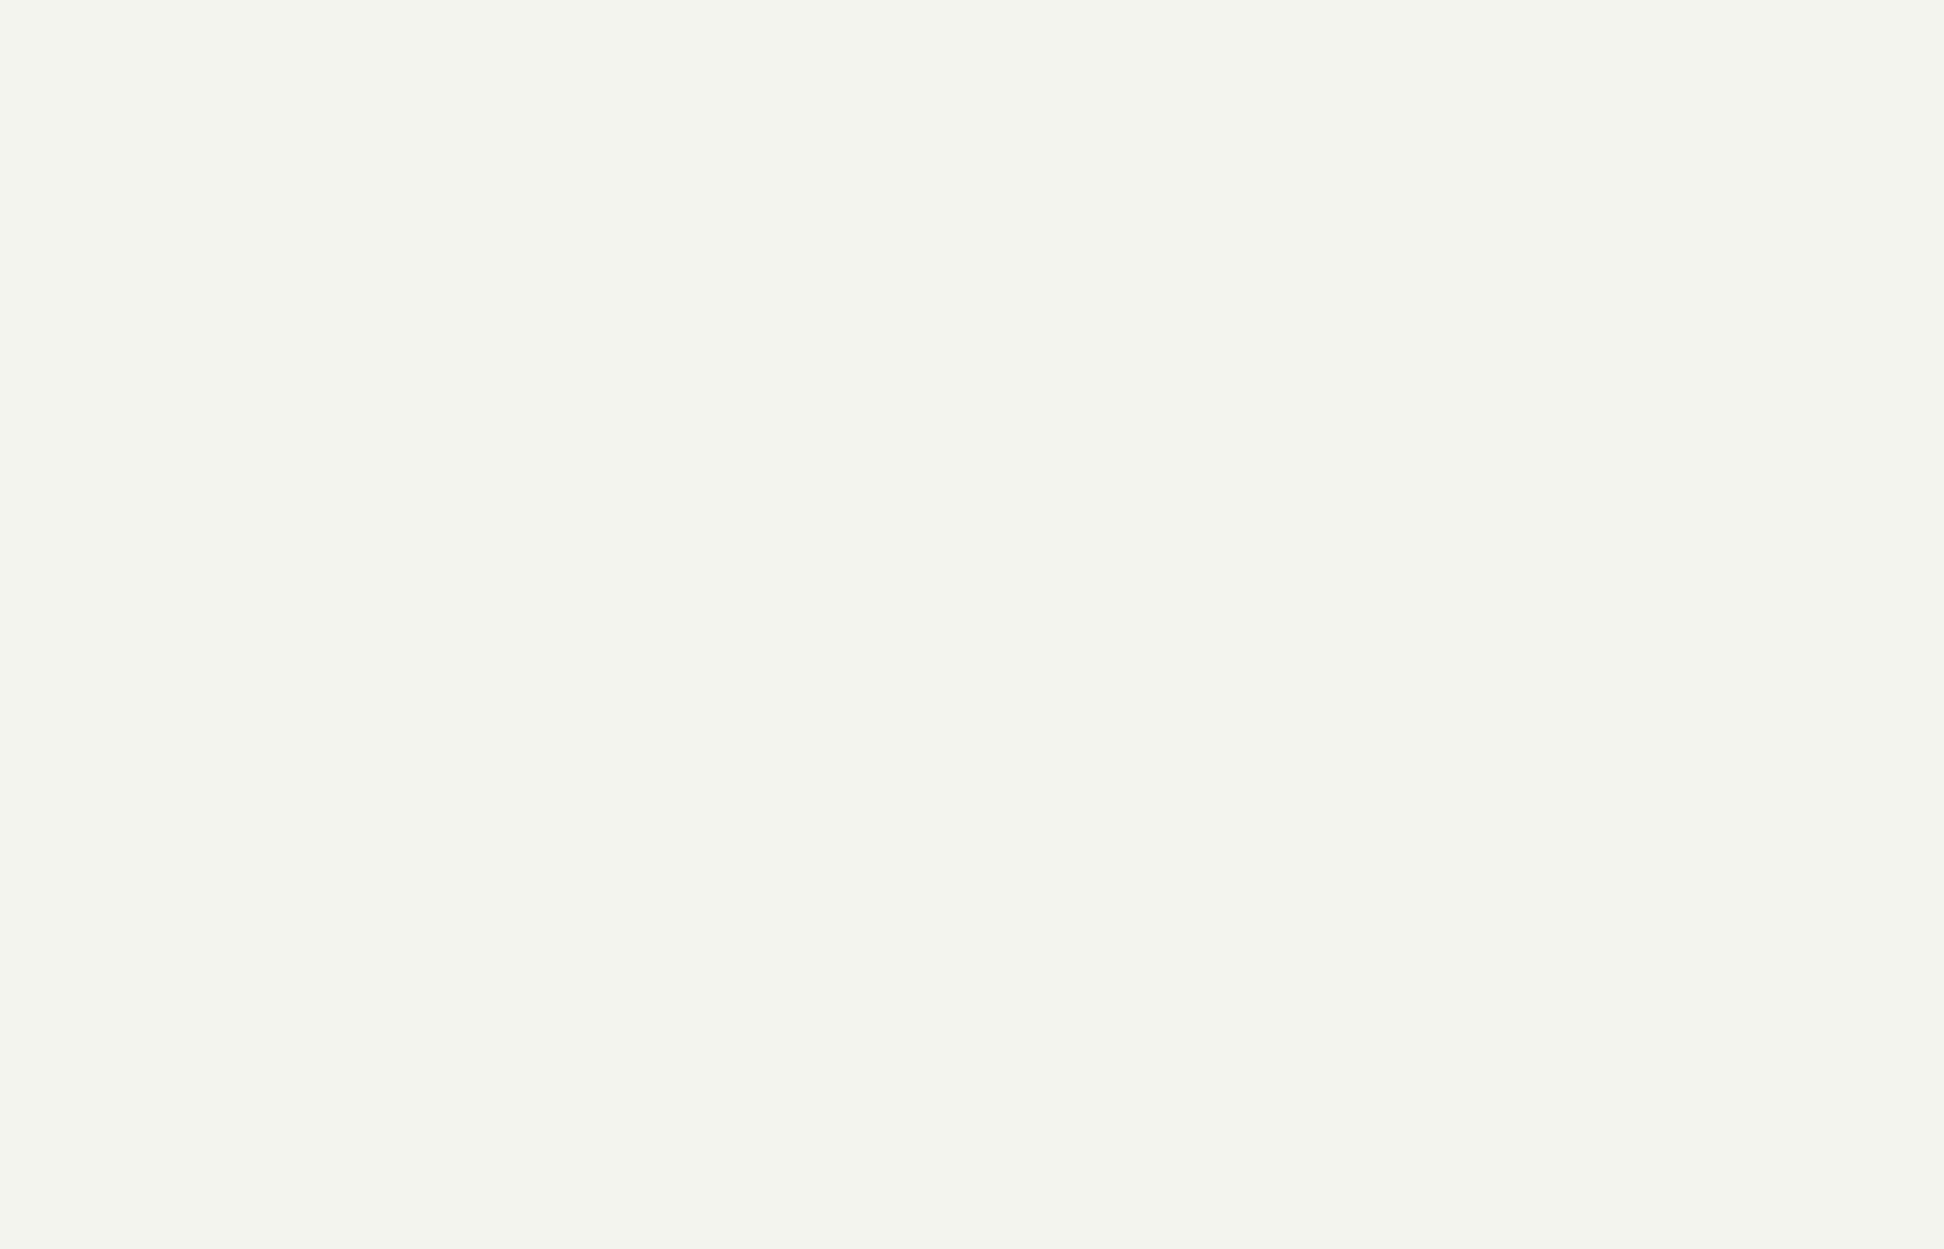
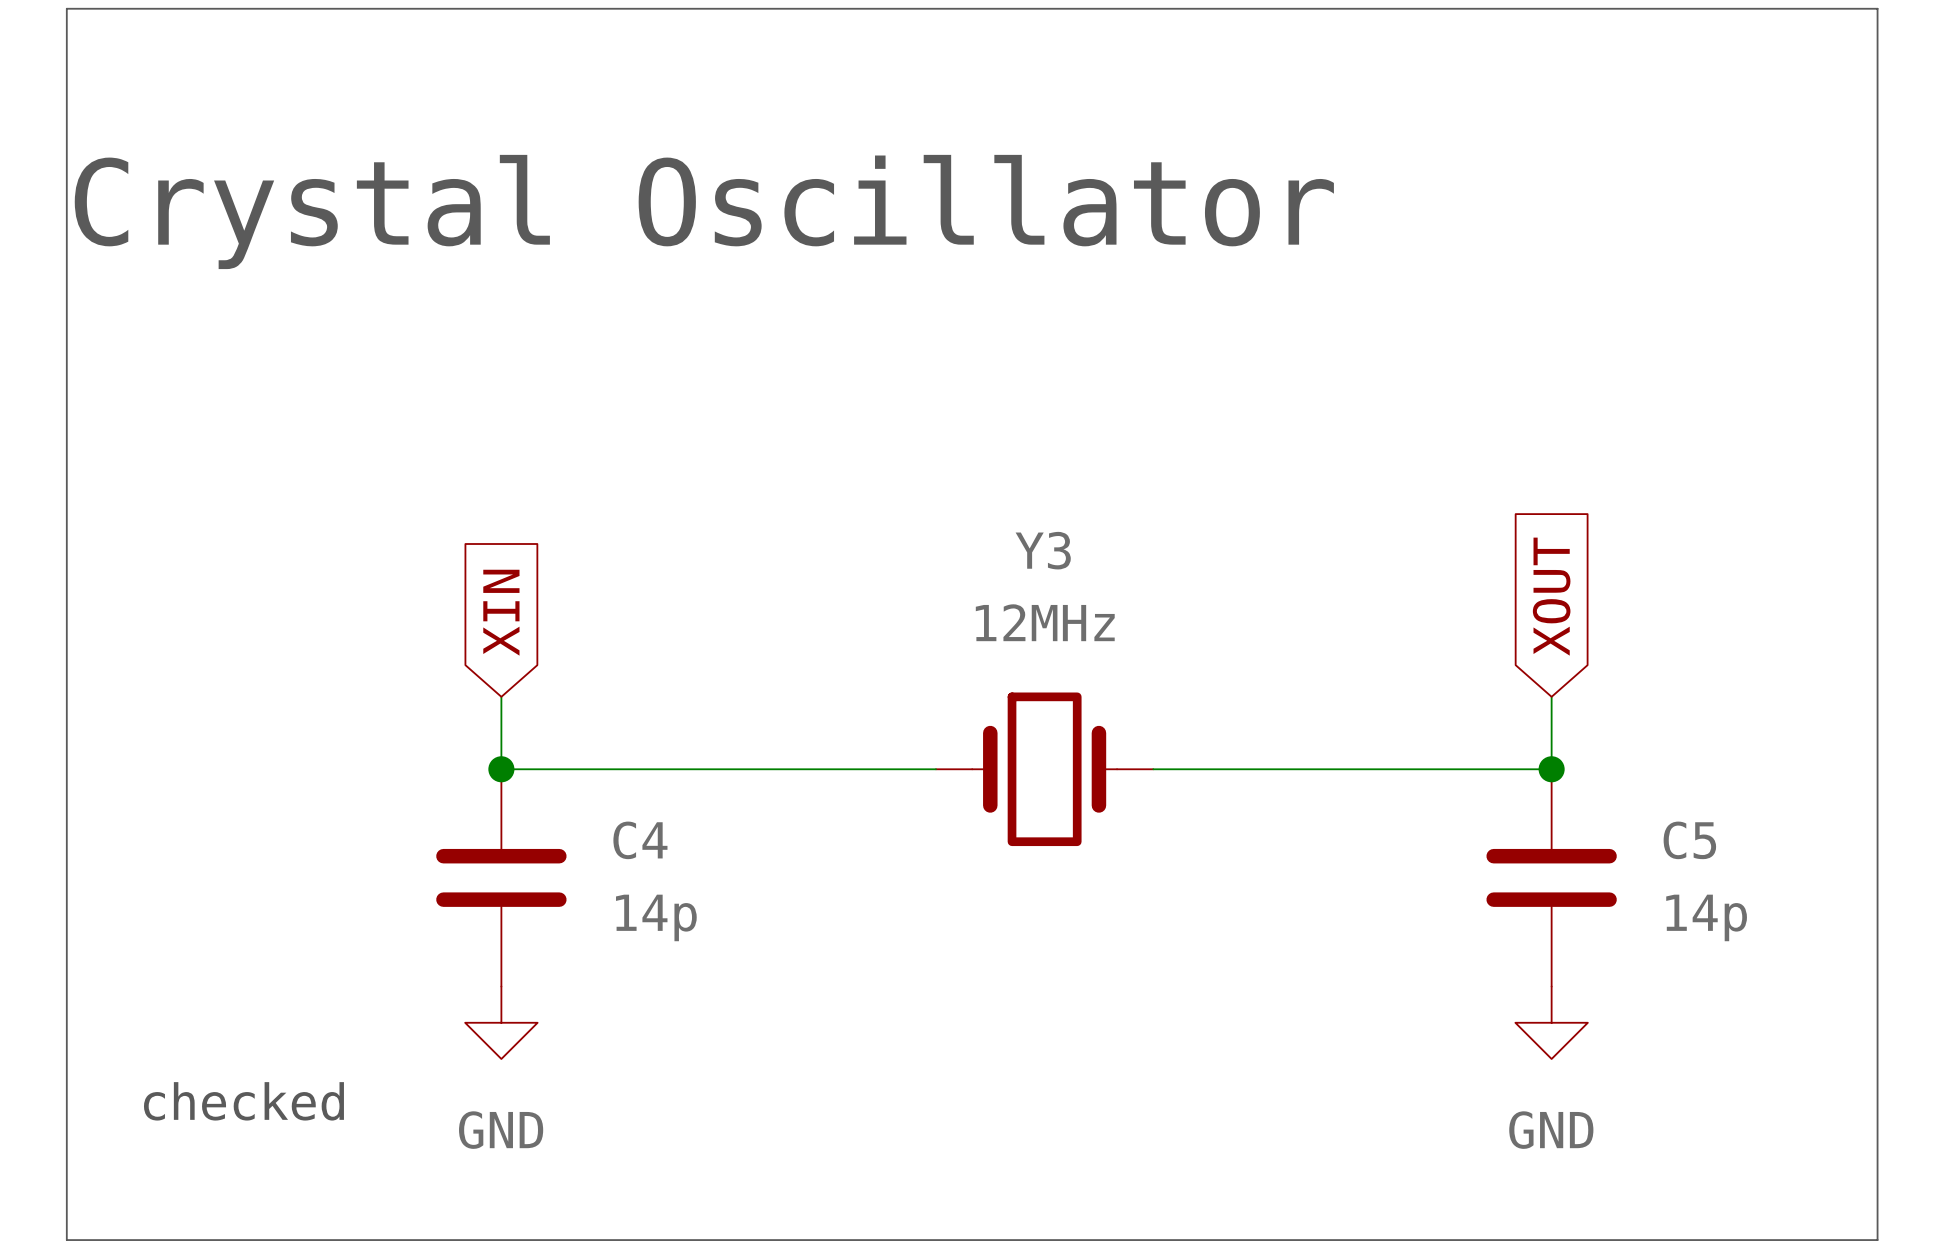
line: none -> (66, 8) (66, 1240) (1877, 1240) (1877, 8) (66, 8)
text: none -> Crystal Oscillator (704, 211)
global label: none -> XOUT (1551, 596)
global label: none -> XIN (501, 612)
wire: none -> (501, 696) (501, 769) (935, 769)
wire: none -> (1551, 696) (1551, 769) (1153, 769)
junction: none -> (501, 769)
Y3: none -> 12MHz (1044, 769)
junction: none -> (1551, 769)
C4: none -> 14p (501, 877)
C5: none -> 14p (1551, 877)
power symbol: none -> GND (501, 1022)
power symbol: none -> GND (1551, 1022)
text: none -> checked (243, 1101)

